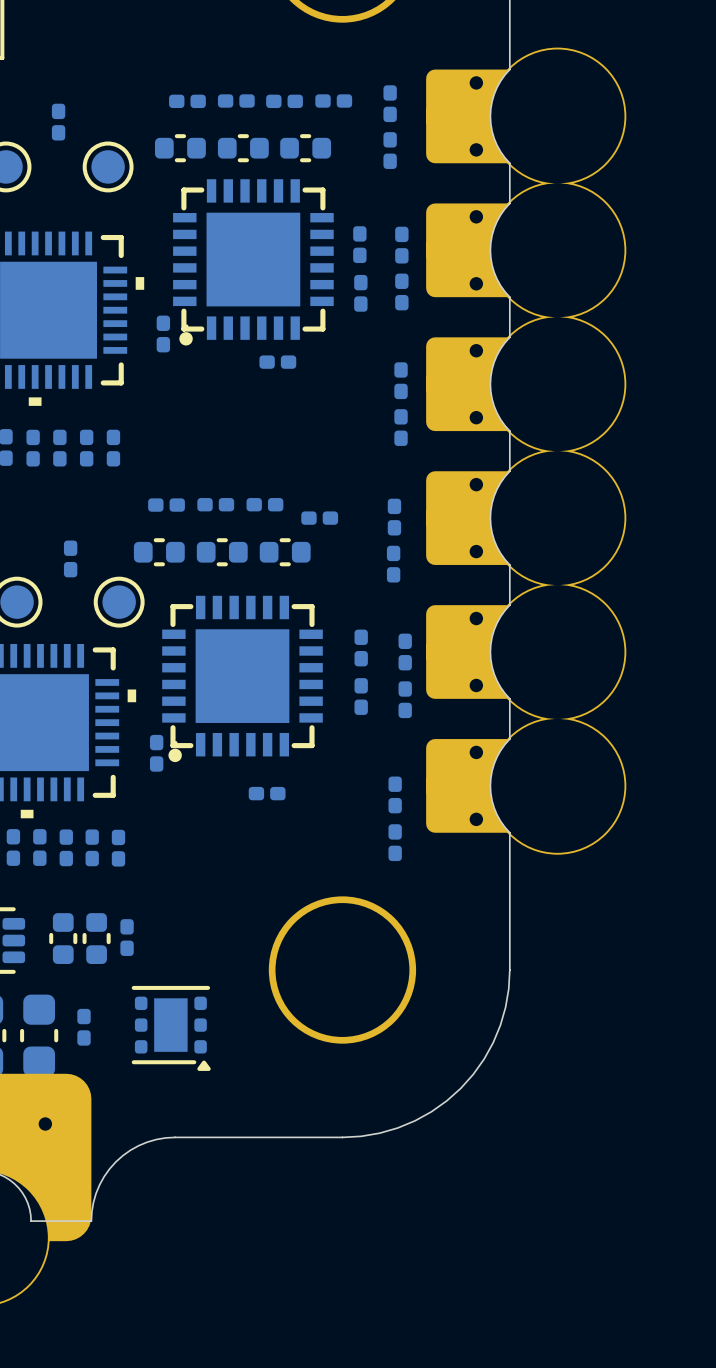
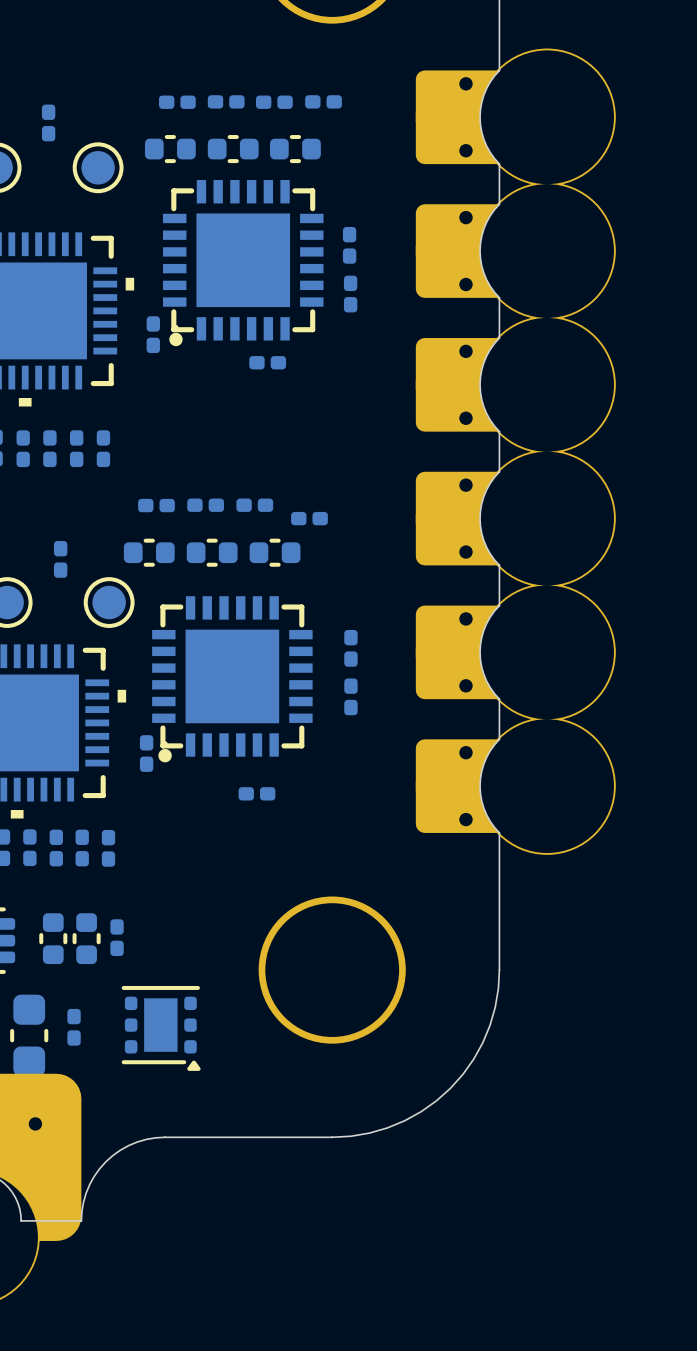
part: (390, 103) -> none
part: (390, 150) -> none
part: (401, 245) -> none
part: (401, 291) -> none
part: (401, 380) -> none
part: (401, 427) -> none
part: (394, 517) -> none
part: (393, 564) -> none
part: (405, 652) -> none
part: (405, 699) -> none
part: (395, 794) -> none
part: (395, 842) -> none

